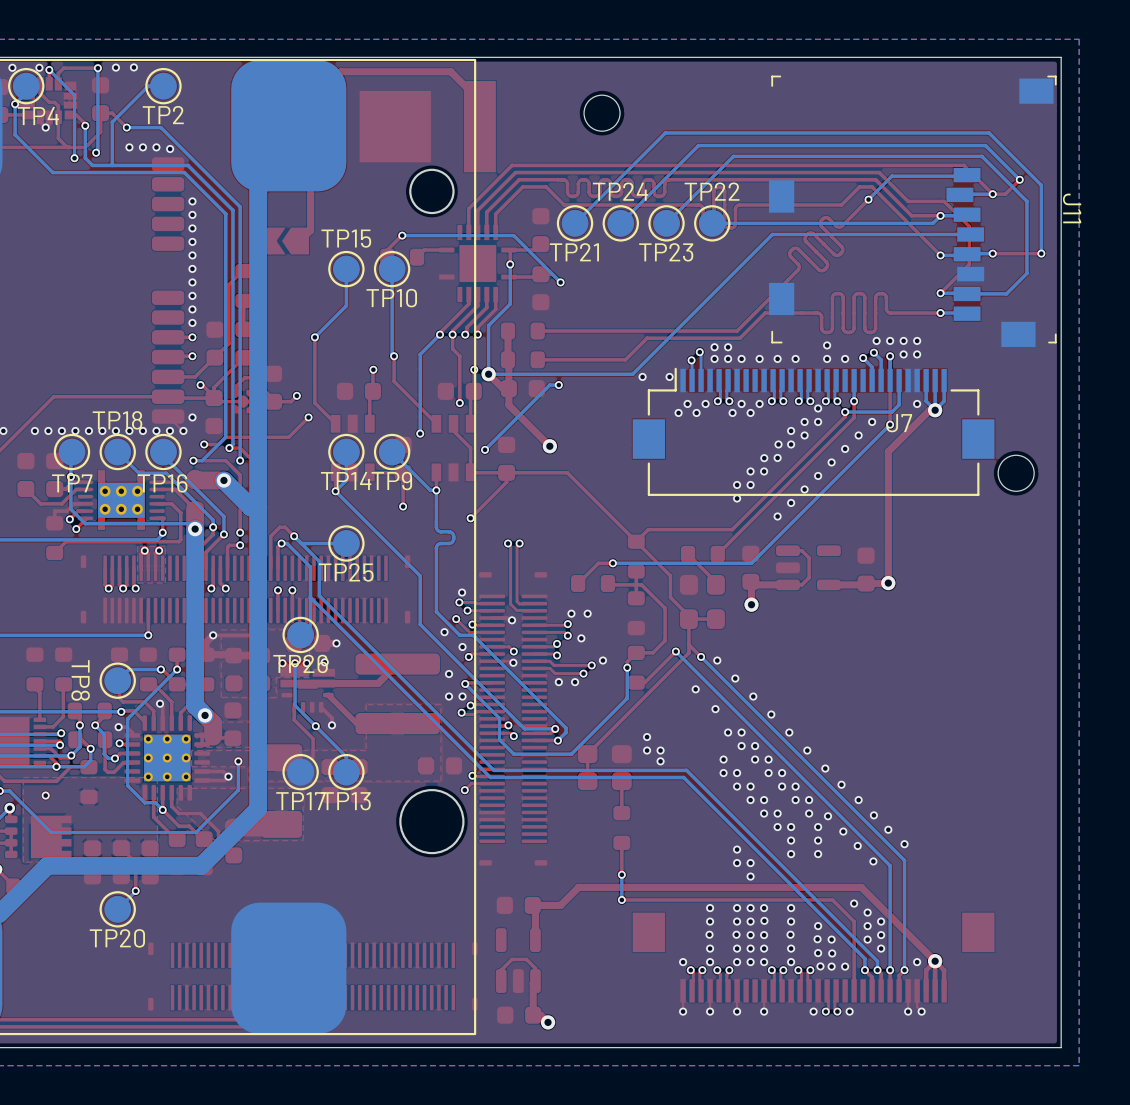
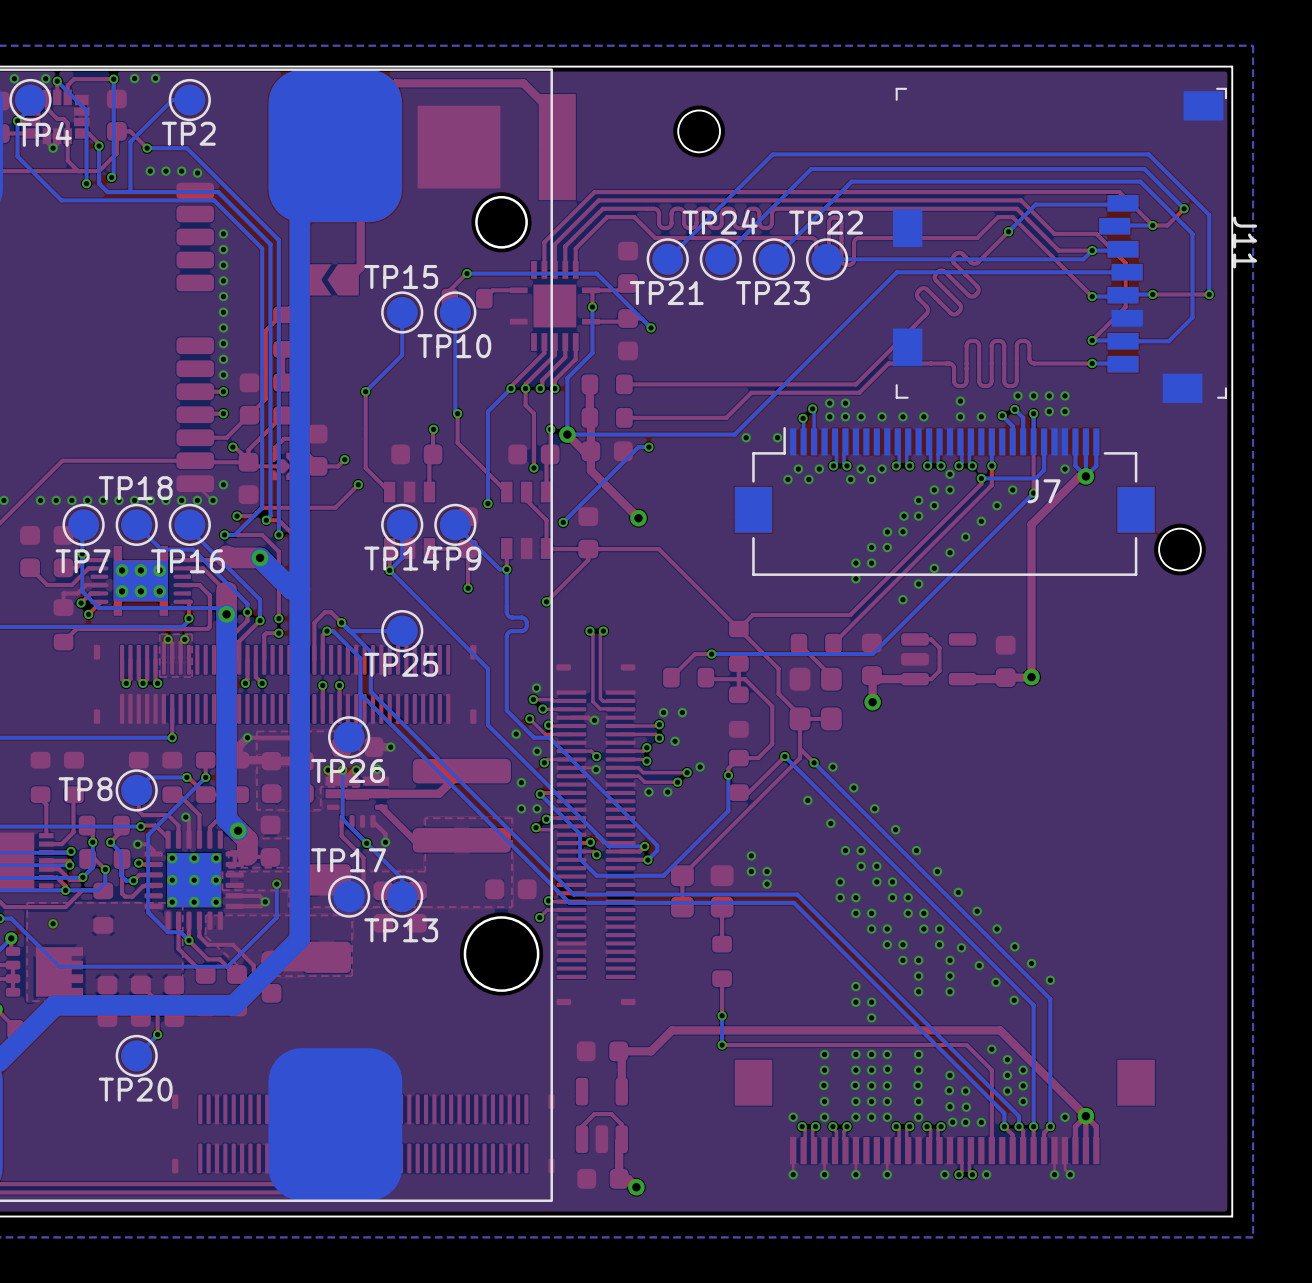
TP8 name rotation: 0° (80, 680) -> 90° counterclockwise (85, 789)
TP17 name position: TP17 (300, 801) -> TP17 (348, 860)

